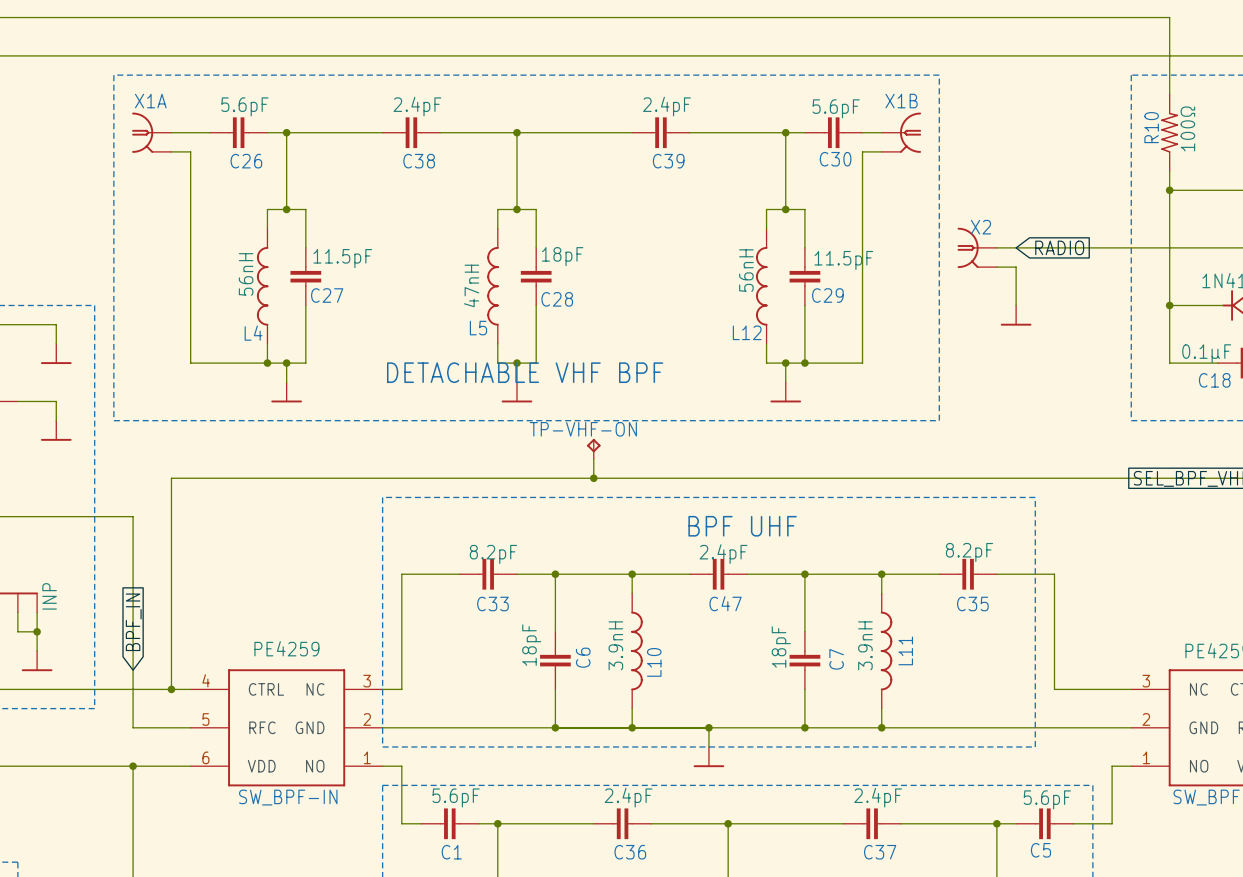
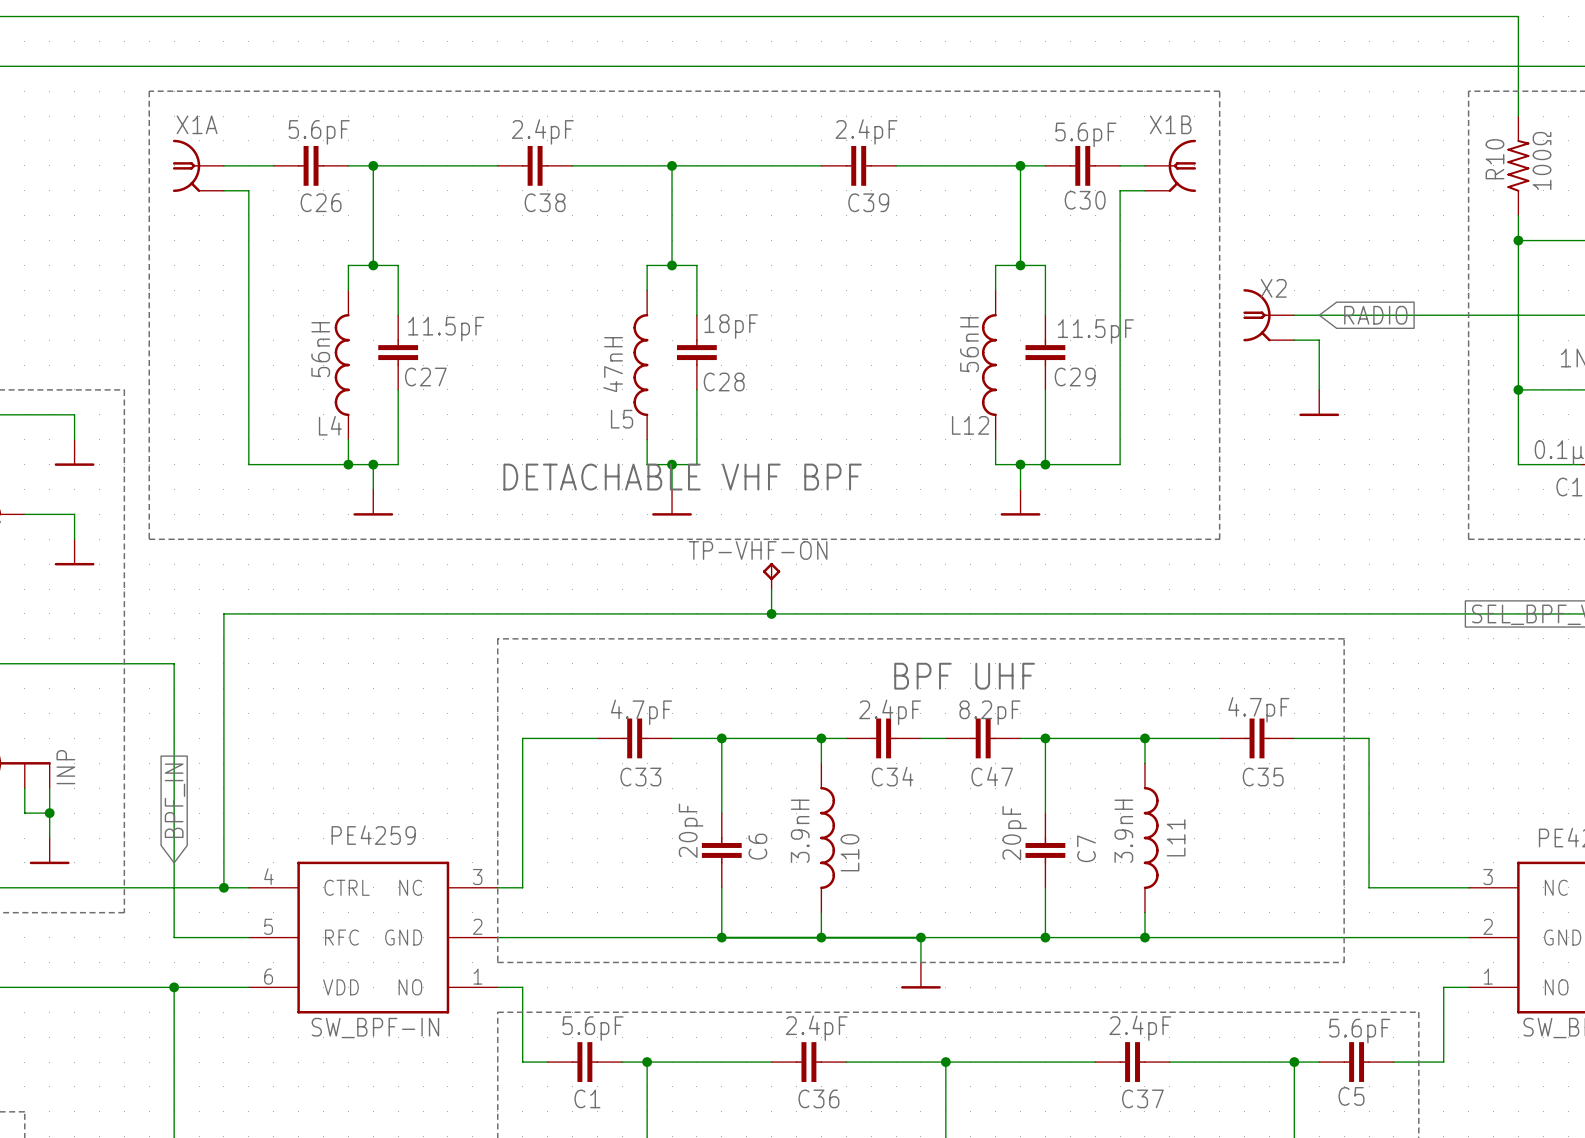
C35 value: 8.2pF (969, 552) -> 4.7pF (1258, 709)
C33 value: 8.2pF (493, 554) -> 4.7pF (641, 712)
C47 value: 2.4pF (723, 554) -> 8.2pF (989, 712)
C34: none -> 2.4pF (883, 738)
C47 position: (718, 574) -> (983, 738)
C6 value: 18pF (531, 645) -> 20pF (691, 830)
C7 value: 18pF (781, 647) -> 20pF (1014, 833)

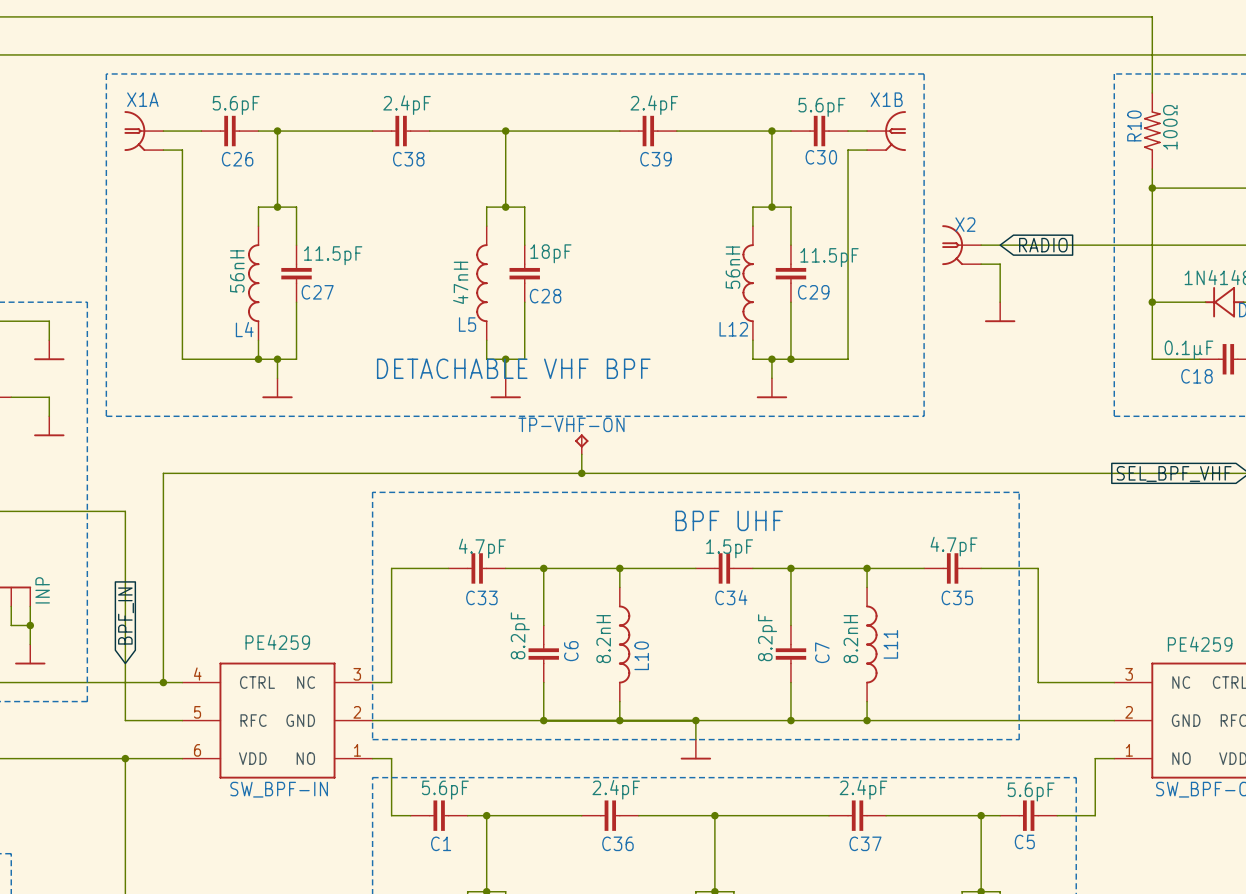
C34 value: 2.4pF (890, 712) -> 1.5pF (729, 548)
C34 position: (883, 738) -> (724, 568)
C47: 8.2pF (983, 738) -> none
C6 value: 20pF (691, 830) -> 8.2pF (520, 635)
L10 value: 3.9nH (800, 831) -> 8.2nH (603, 639)
L11 value: 3.9nH (1123, 831) -> 8.2nH (850, 639)
C7 value: 20pF (1014, 833) -> 8.2pF (767, 637)

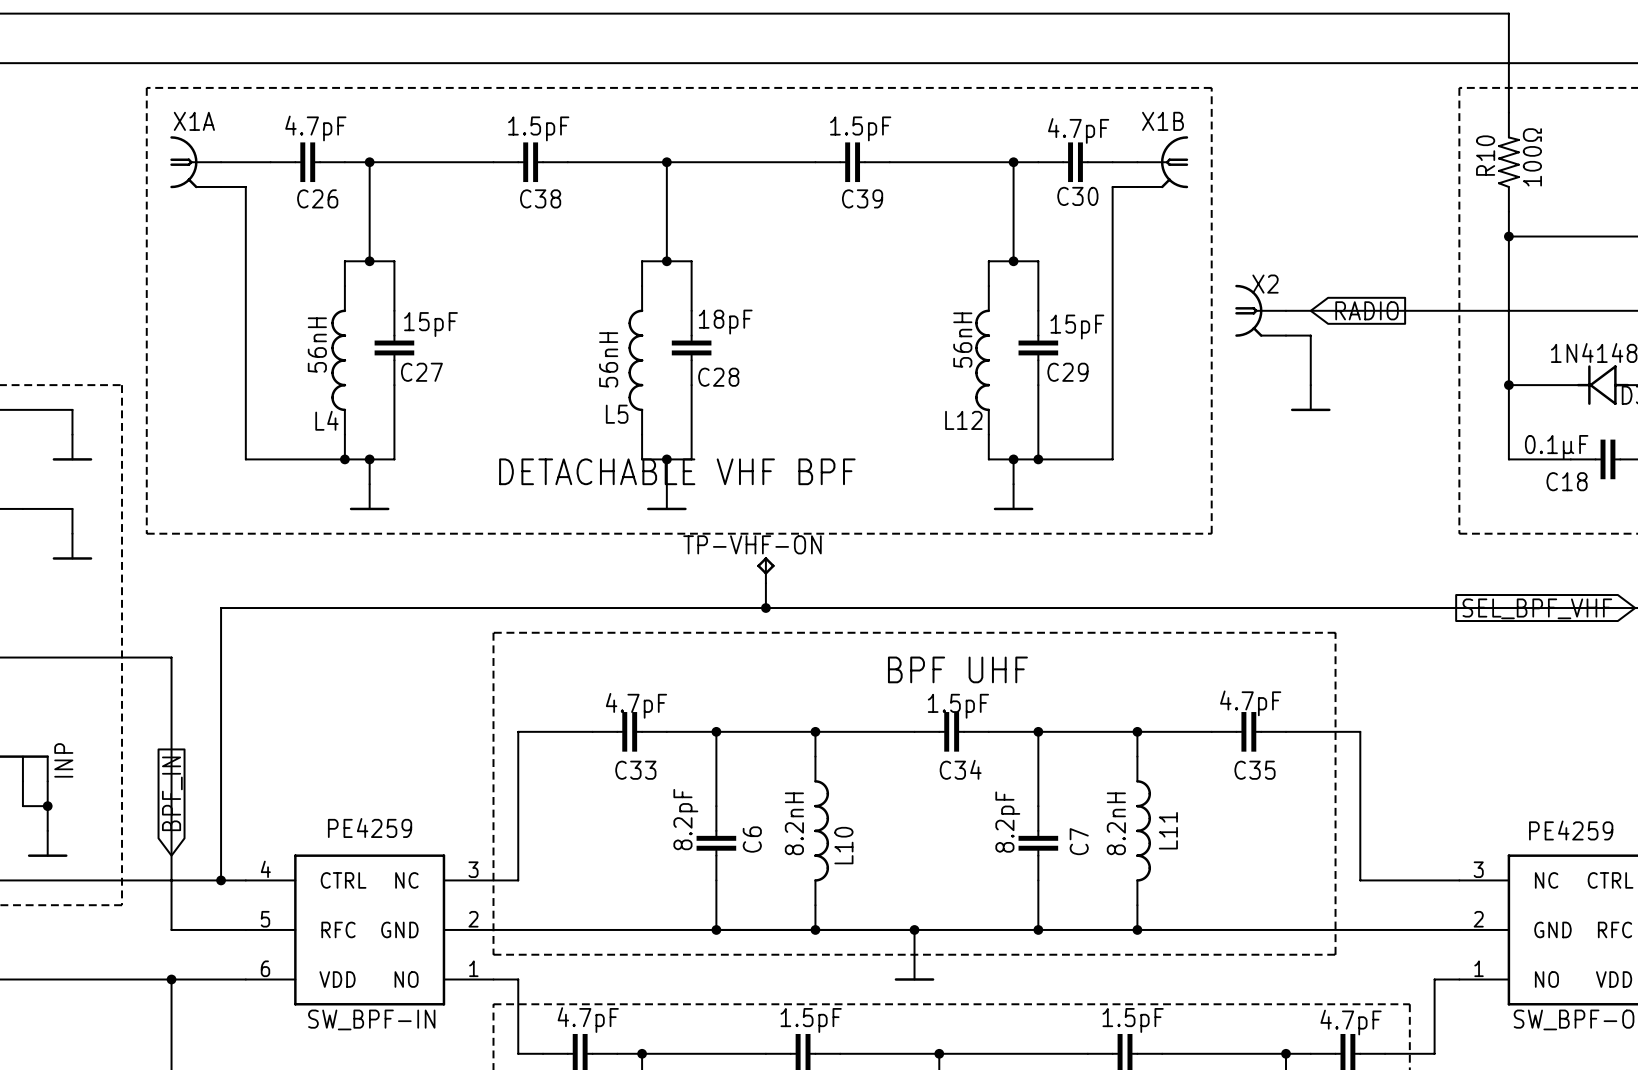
C26 value: 5.6pF (236, 105) -> 4.7pF (315, 128)
C38 value: 2.4pF (407, 105) -> 1.5pF (538, 128)
C39 value: 2.4pF (654, 105) -> 1.5pF (860, 128)
C30 value: 5.6pF (821, 107) -> 4.7pF (1078, 130)
C27 value: 11.5pF (333, 255) -> 15pF (430, 324)
C29 value: 11.5pF (829, 257) -> 15pF (1077, 327)
L5 value: 47nH (460, 282) -> 56nH (608, 359)
C36 value: 2.4pF (616, 789) -> 1.5pF (811, 1020)
C37 value: 2.4pF (863, 789) -> 1.5pF (1133, 1020)
C1 value: 5.6pF (445, 790) -> 4.7pF (588, 1020)
C5 value: 5.6pF (1031, 791) -> 4.7pF (1351, 1022)

